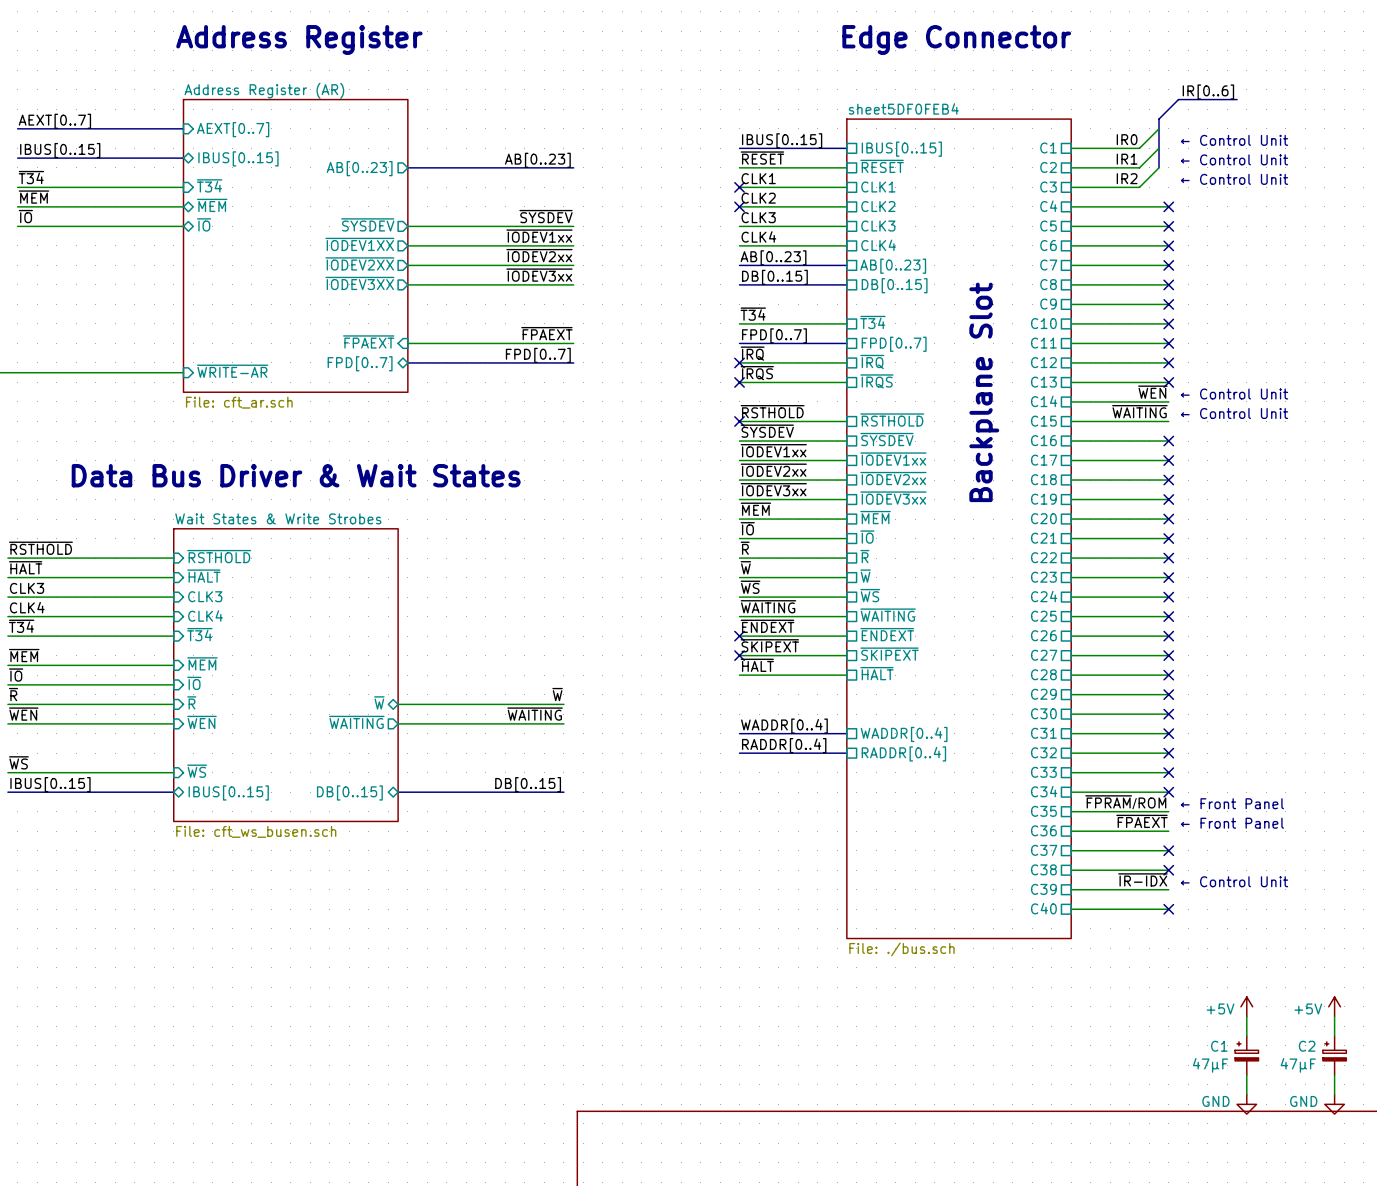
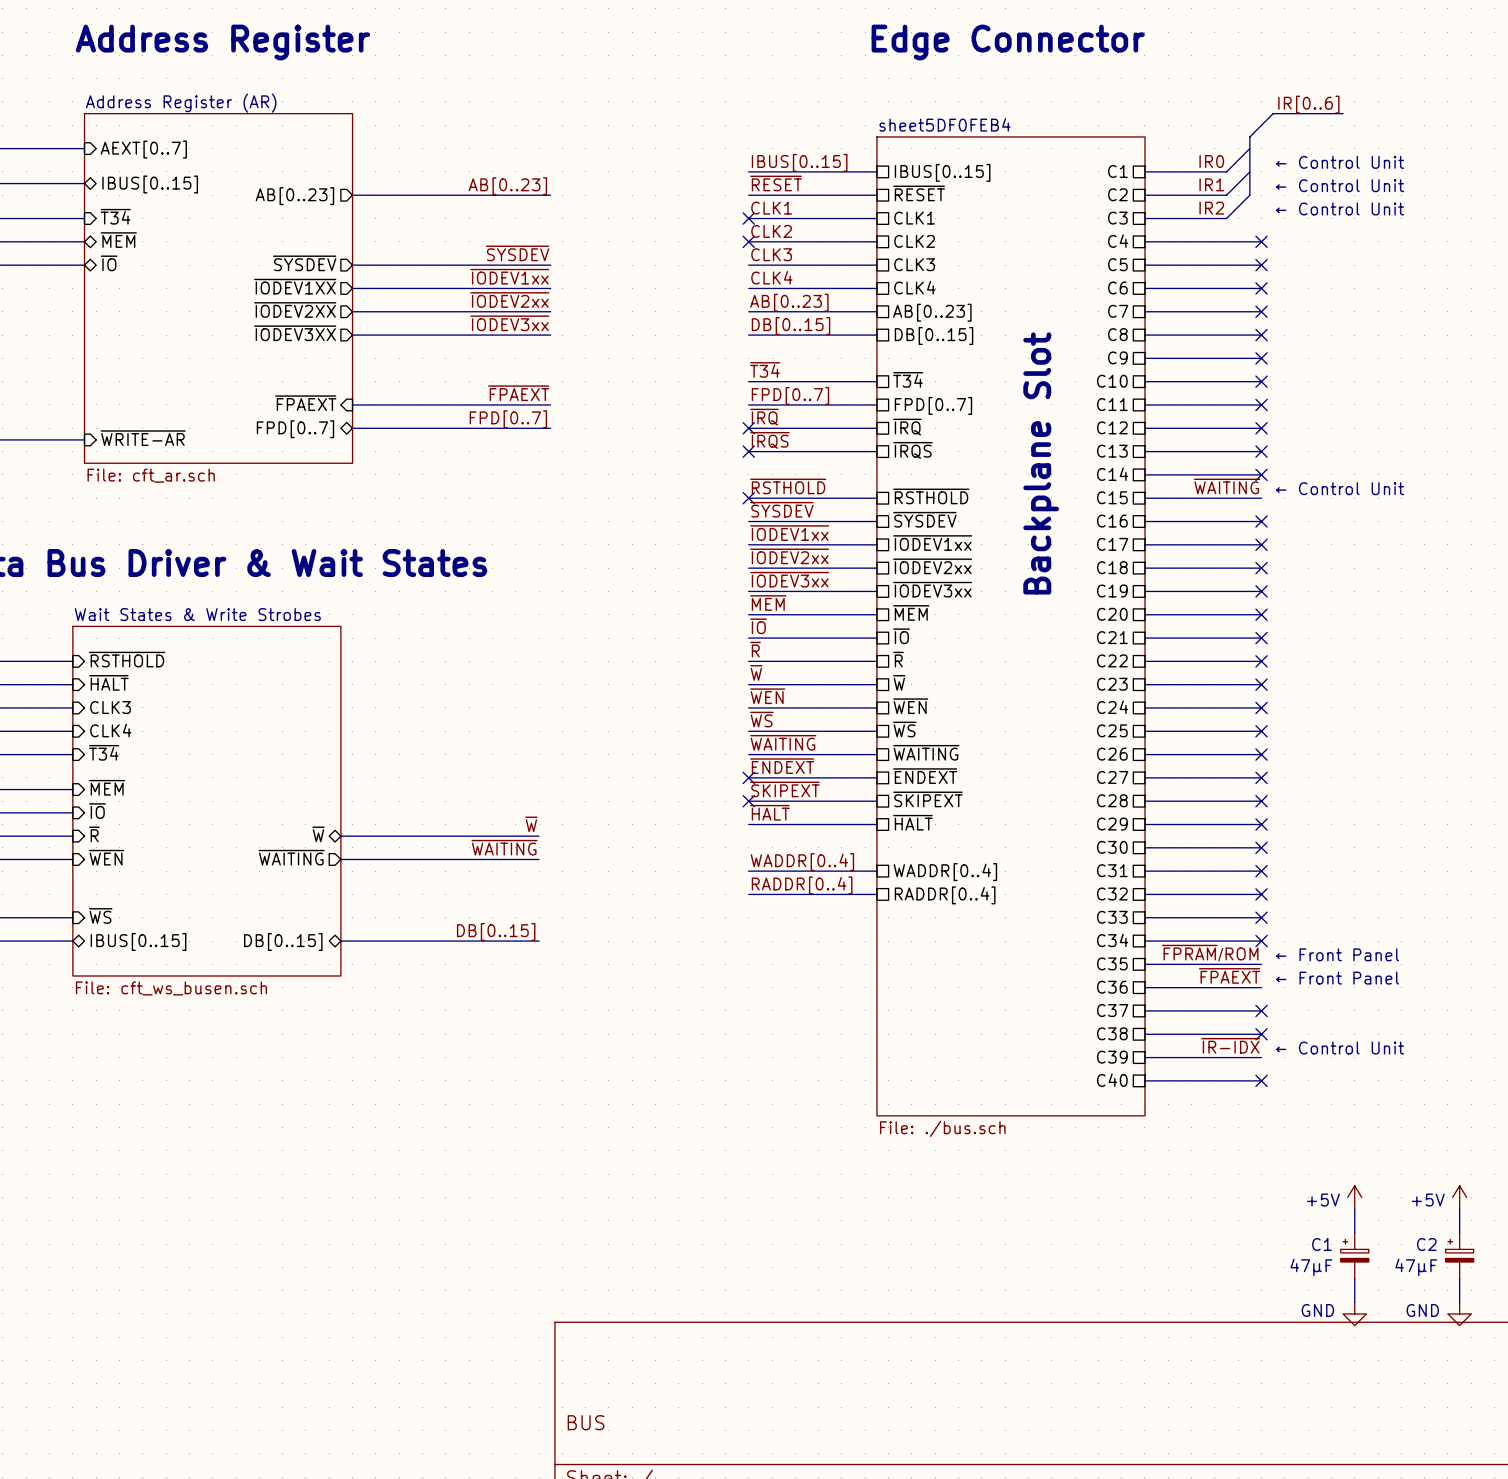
label: ~{WEN} (1152, 392) -> none
text: ← Control Unit (1234, 393) -> none
no-connect mark: none -> (1261, 474)
label: ~{WS} (750, 587) -> ~{WEN} (767, 696)
sheet pin: ~{WS} (870, 595) -> ~{WEN} (910, 706)
label: ~{WAITING} (768, 606) -> ~{WS} (761, 719)
sheet pin: ~{WAITING} (888, 615) -> ~{WS} (904, 729)
label: ~{ENDEXT} (767, 626) -> ~{WAITING} (783, 742)
sheet pin: ~{ENDEXT} (887, 634) -> ~{WAITING} (926, 752)
no-connect mark position: (739, 636) -> (748, 801)
label: ~{SKIPEXT} (769, 645) -> ~{ENDEXT} (782, 766)
sheet pin: ~{SKIPEXT} (889, 654) -> ~{ENDEXT} (925, 776)
label: ~{HALT} (757, 665) -> ~{SKIPEXT} (784, 789)
sheet pin: ~{HALT} (876, 673) -> ~{SKIPEXT} (927, 799)
label: none -> ~{HALT} (769, 812)
sheet pin: none -> ~{HALT} (912, 822)
wire: none -> (748, 824) (876, 824)

